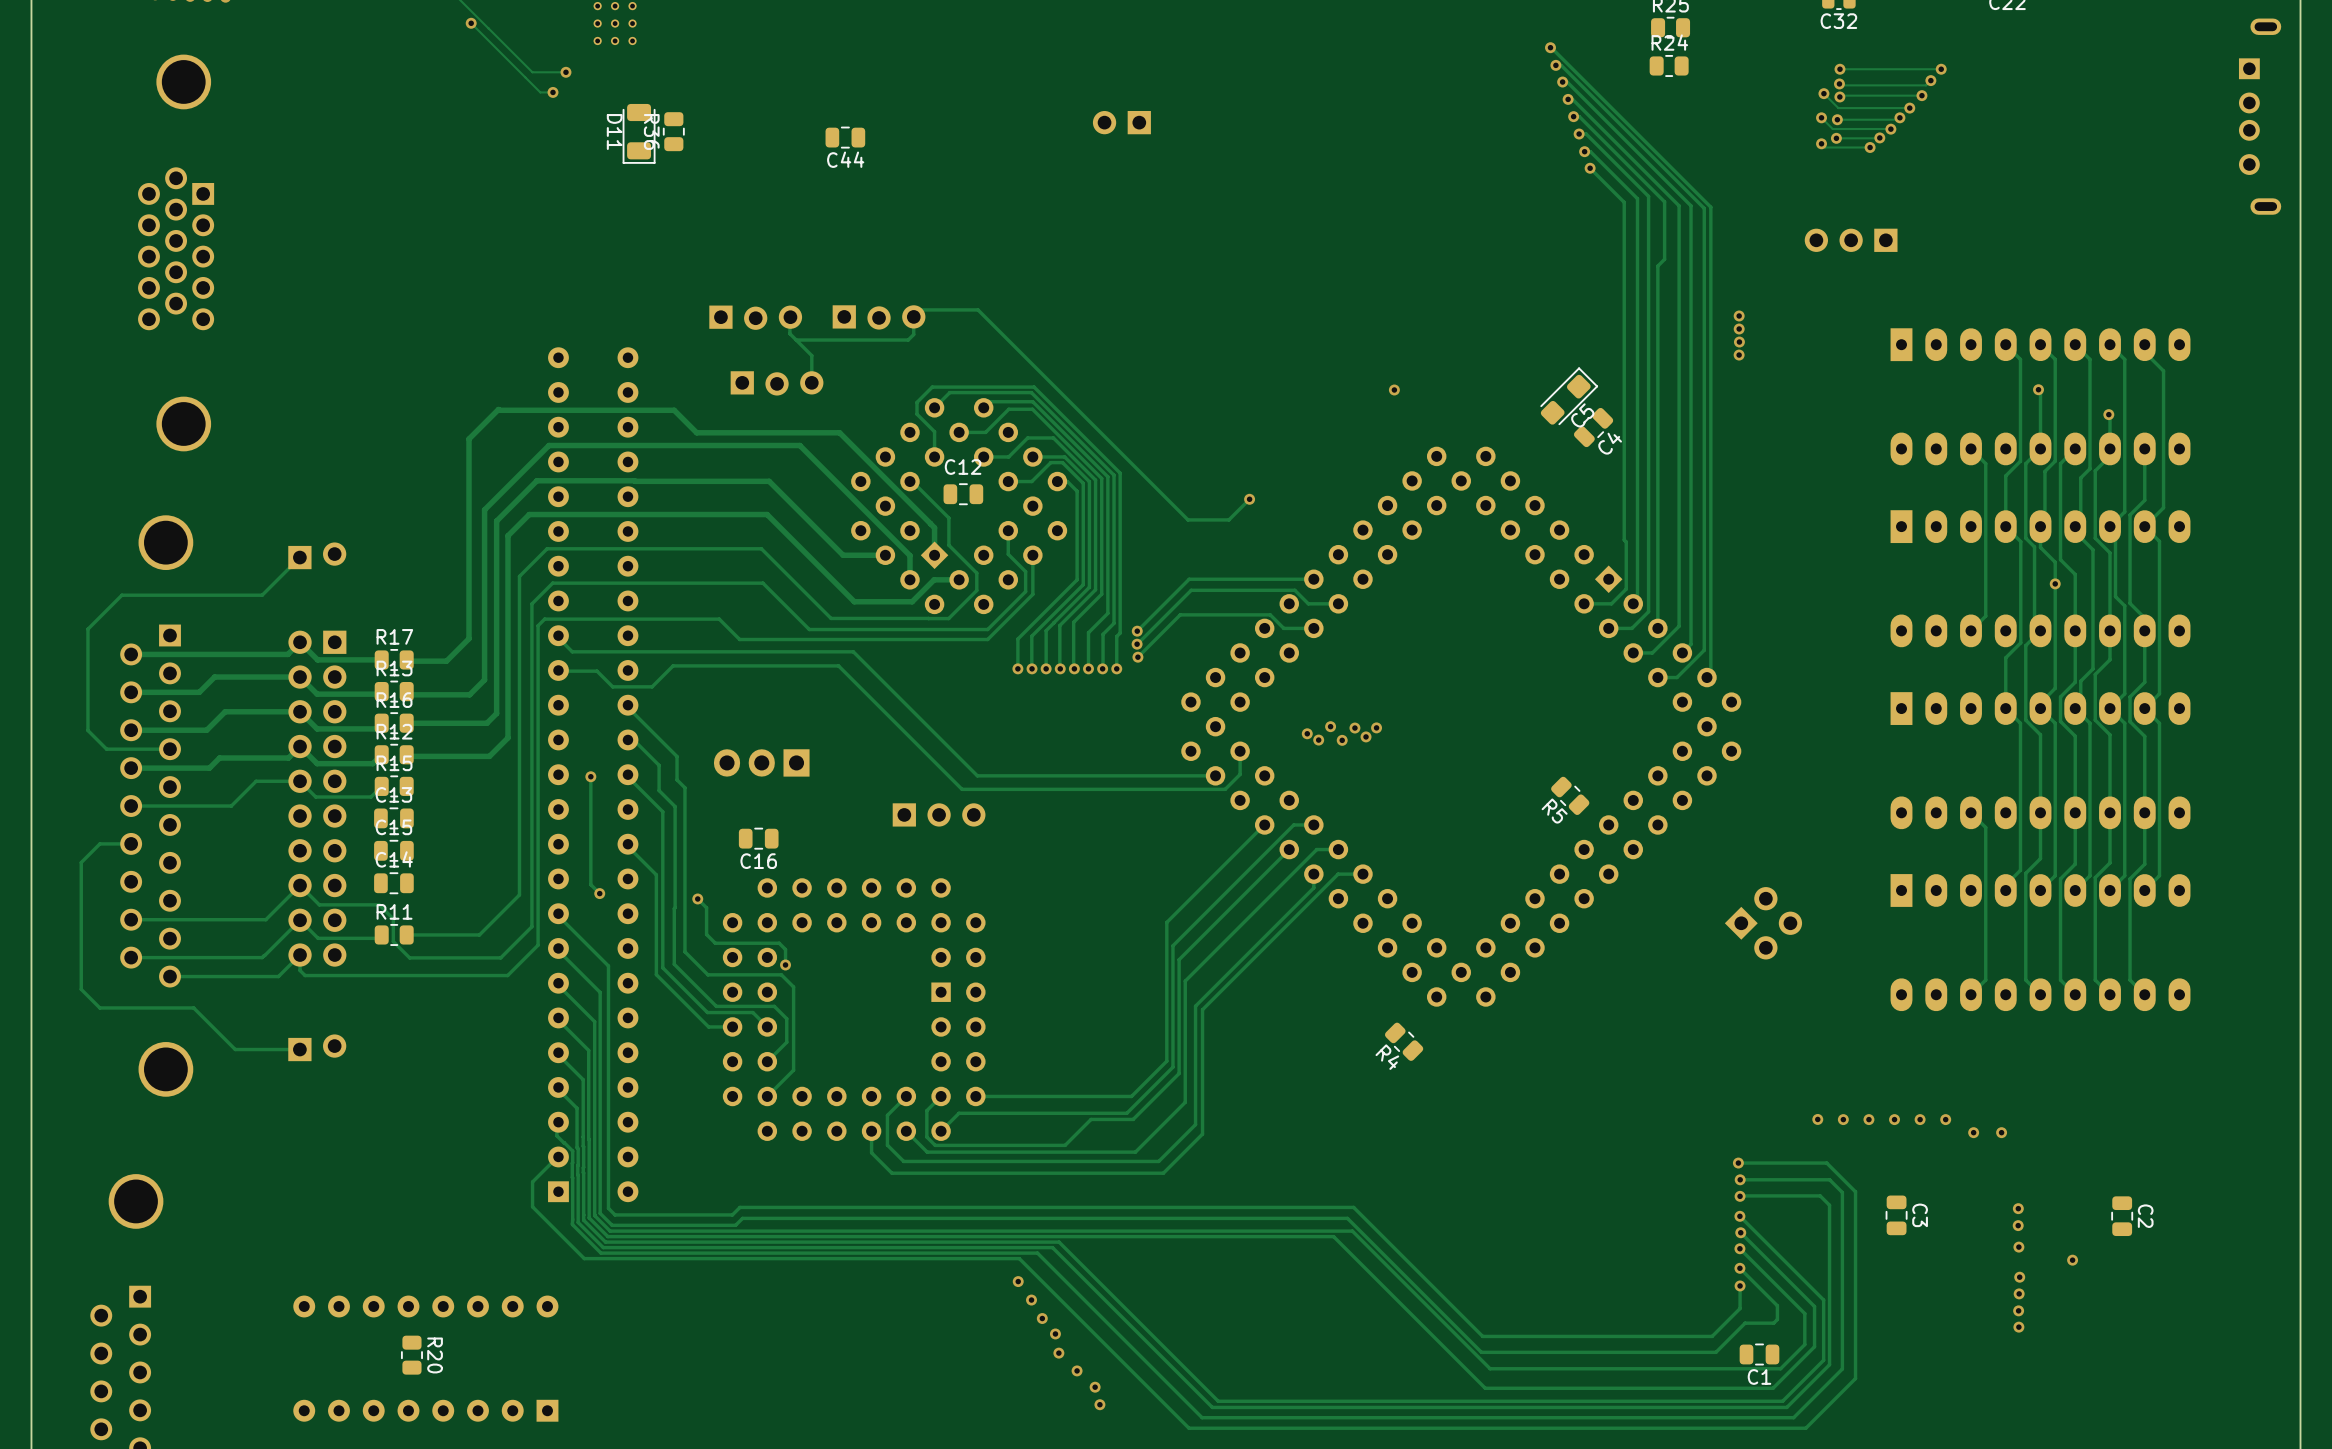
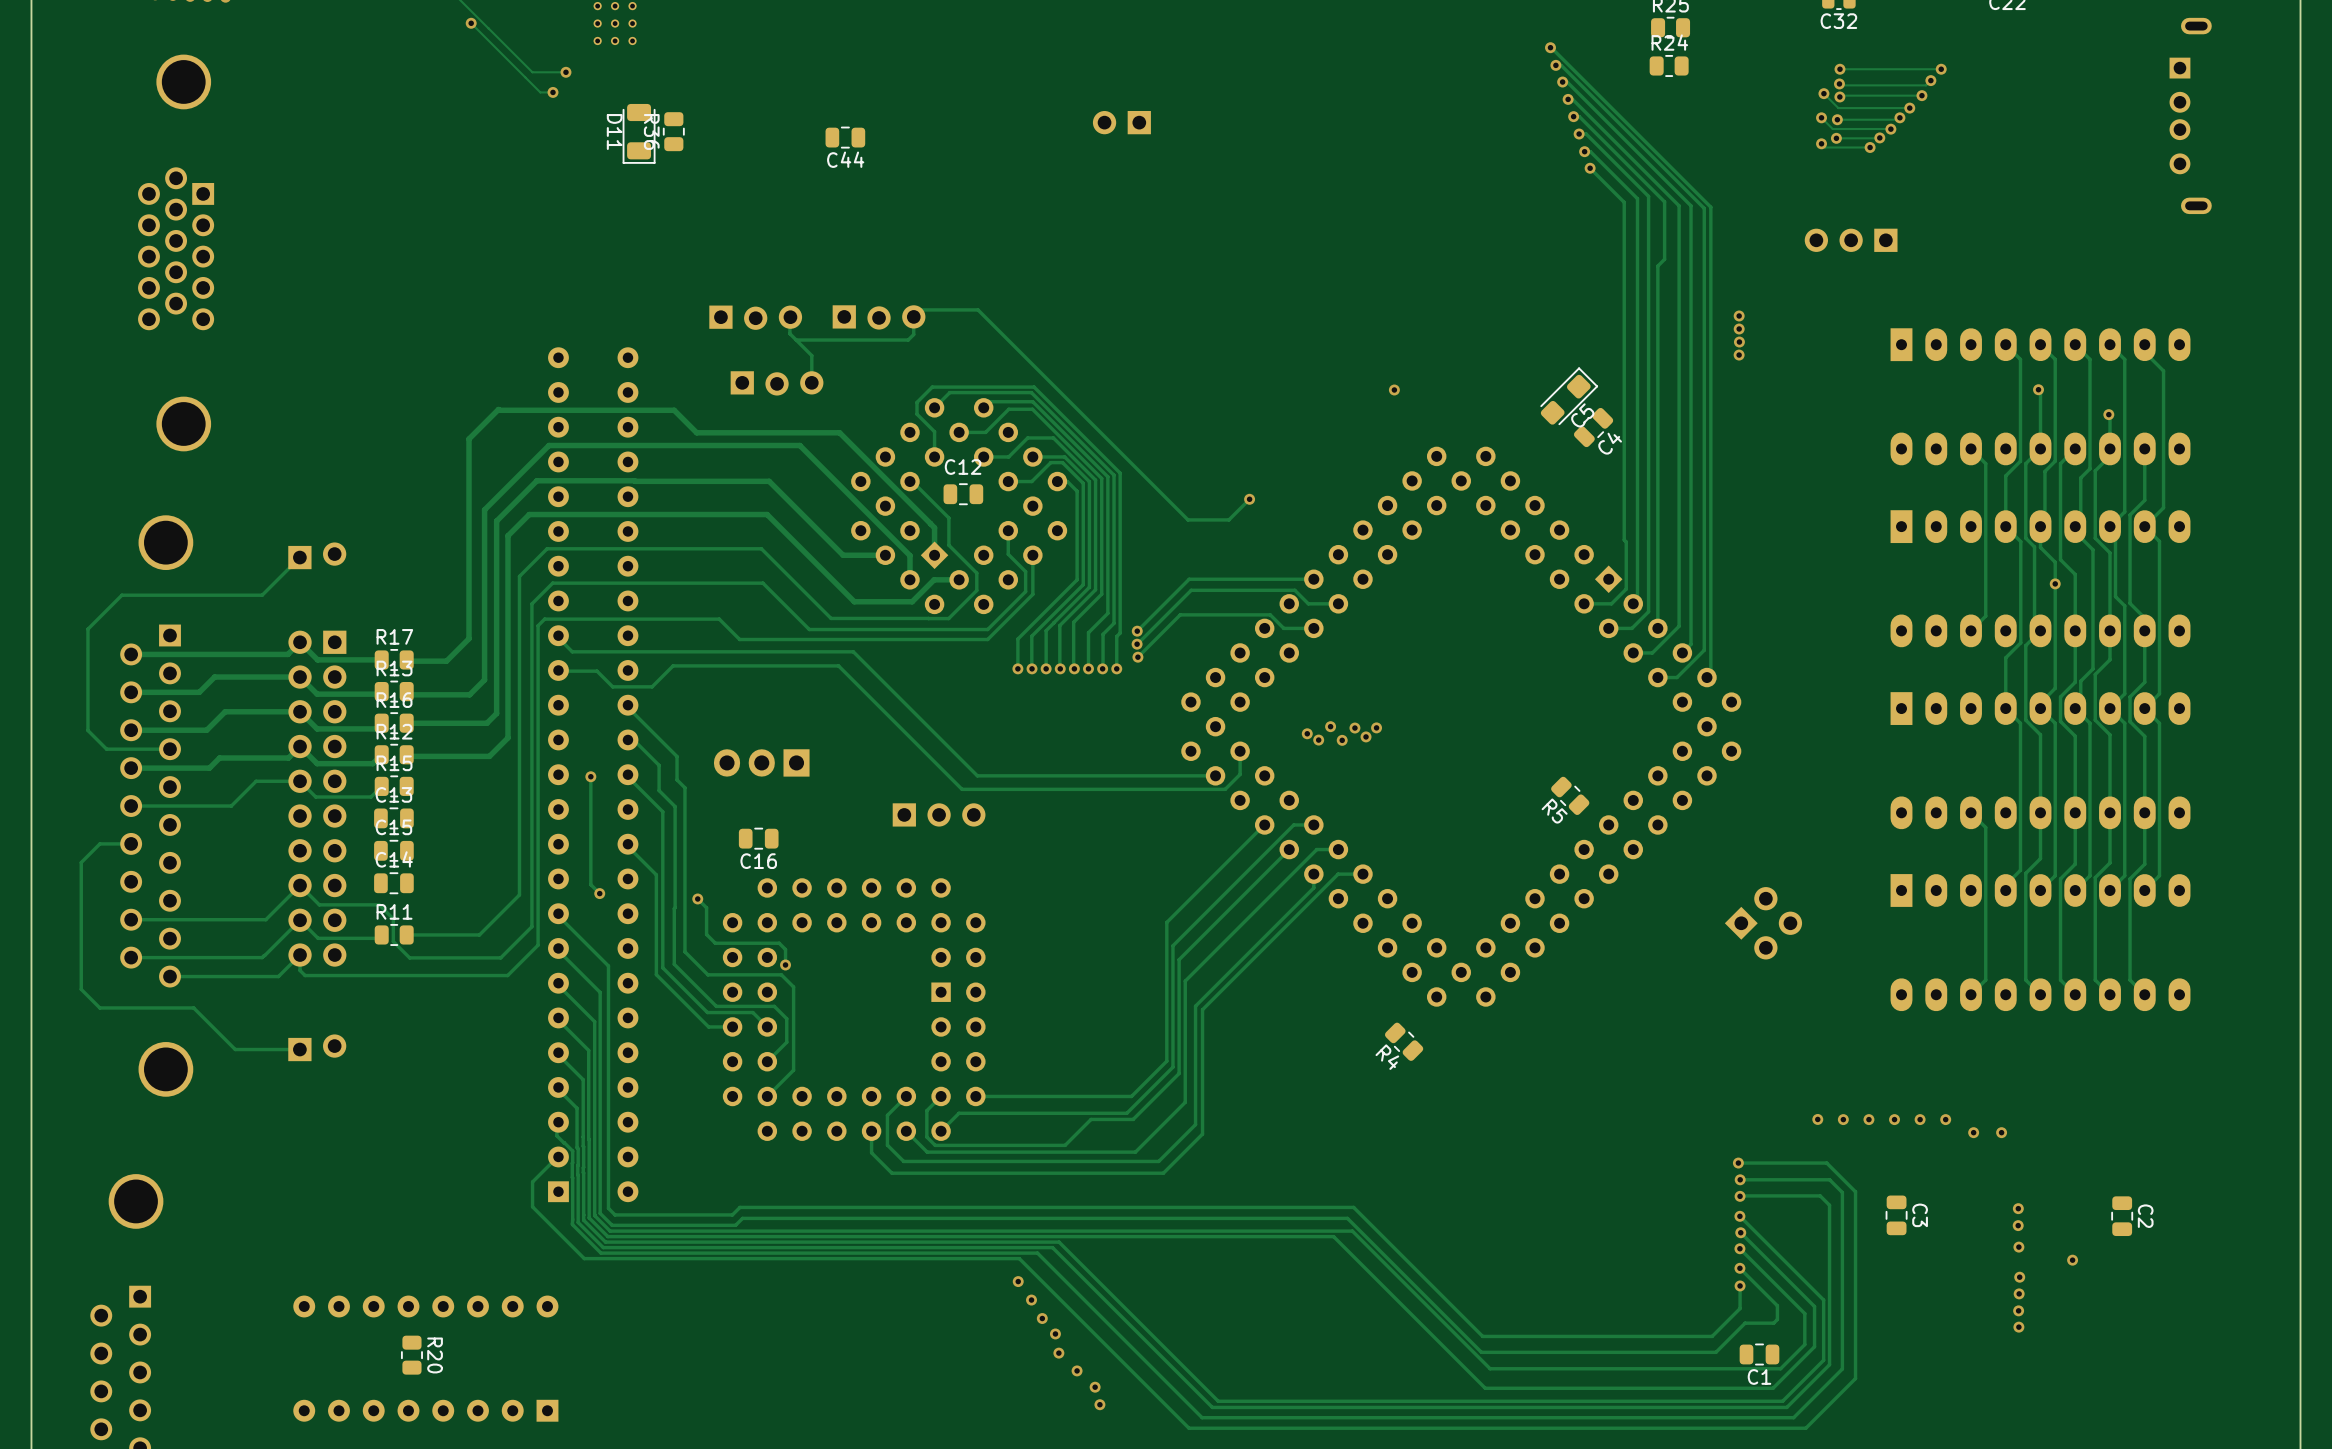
part position: (2260, 116) -> (2190, 115)

